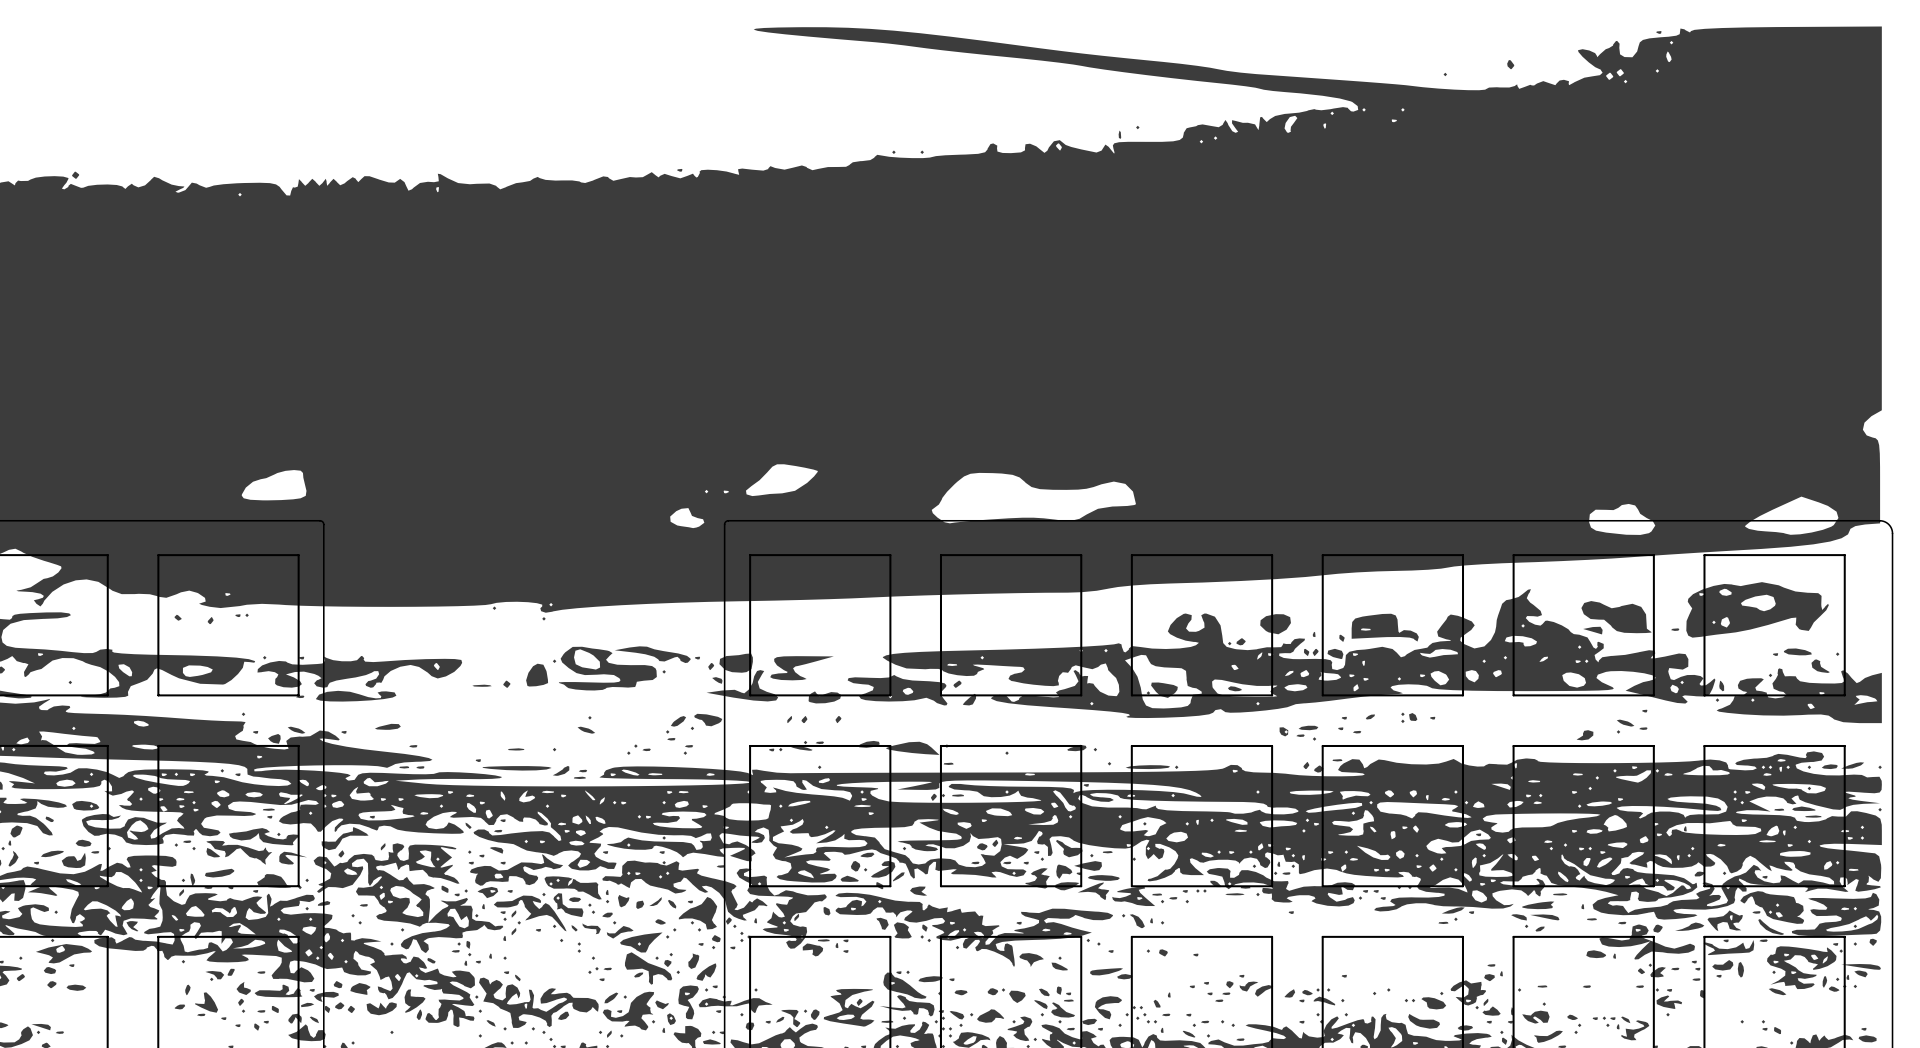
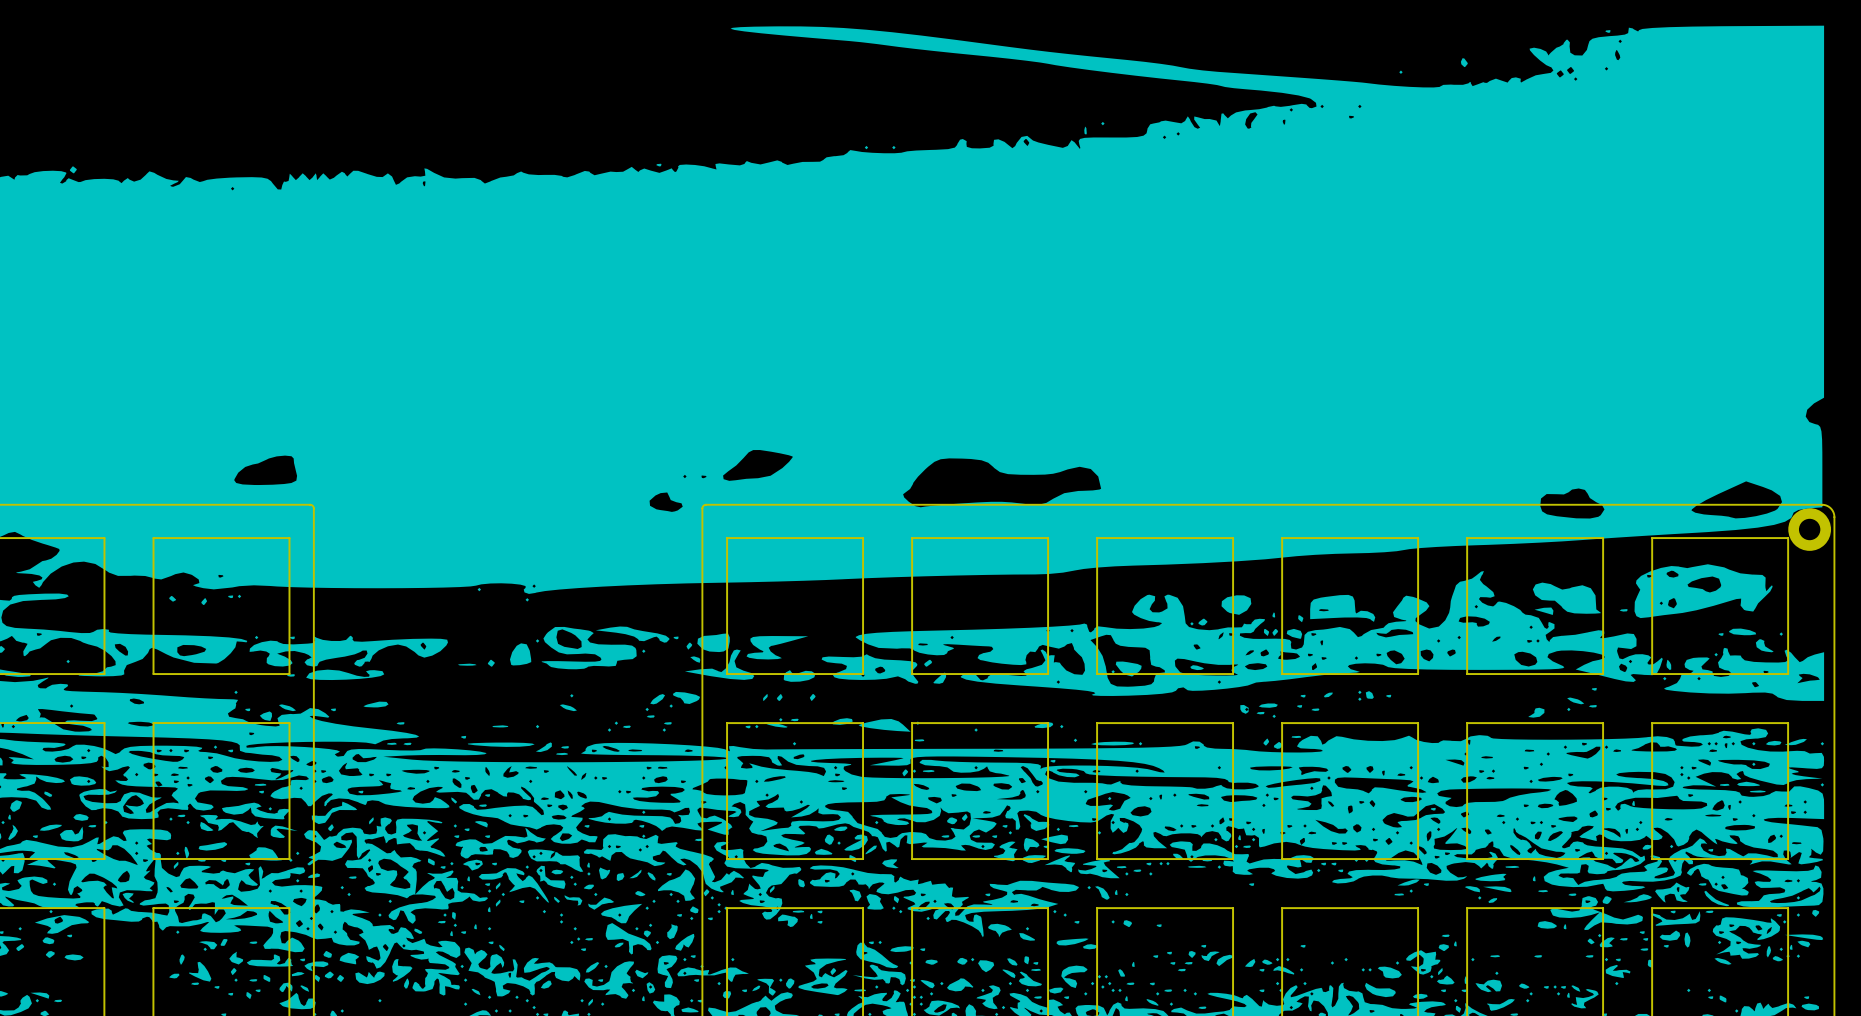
part: none -> (1809, 529)

